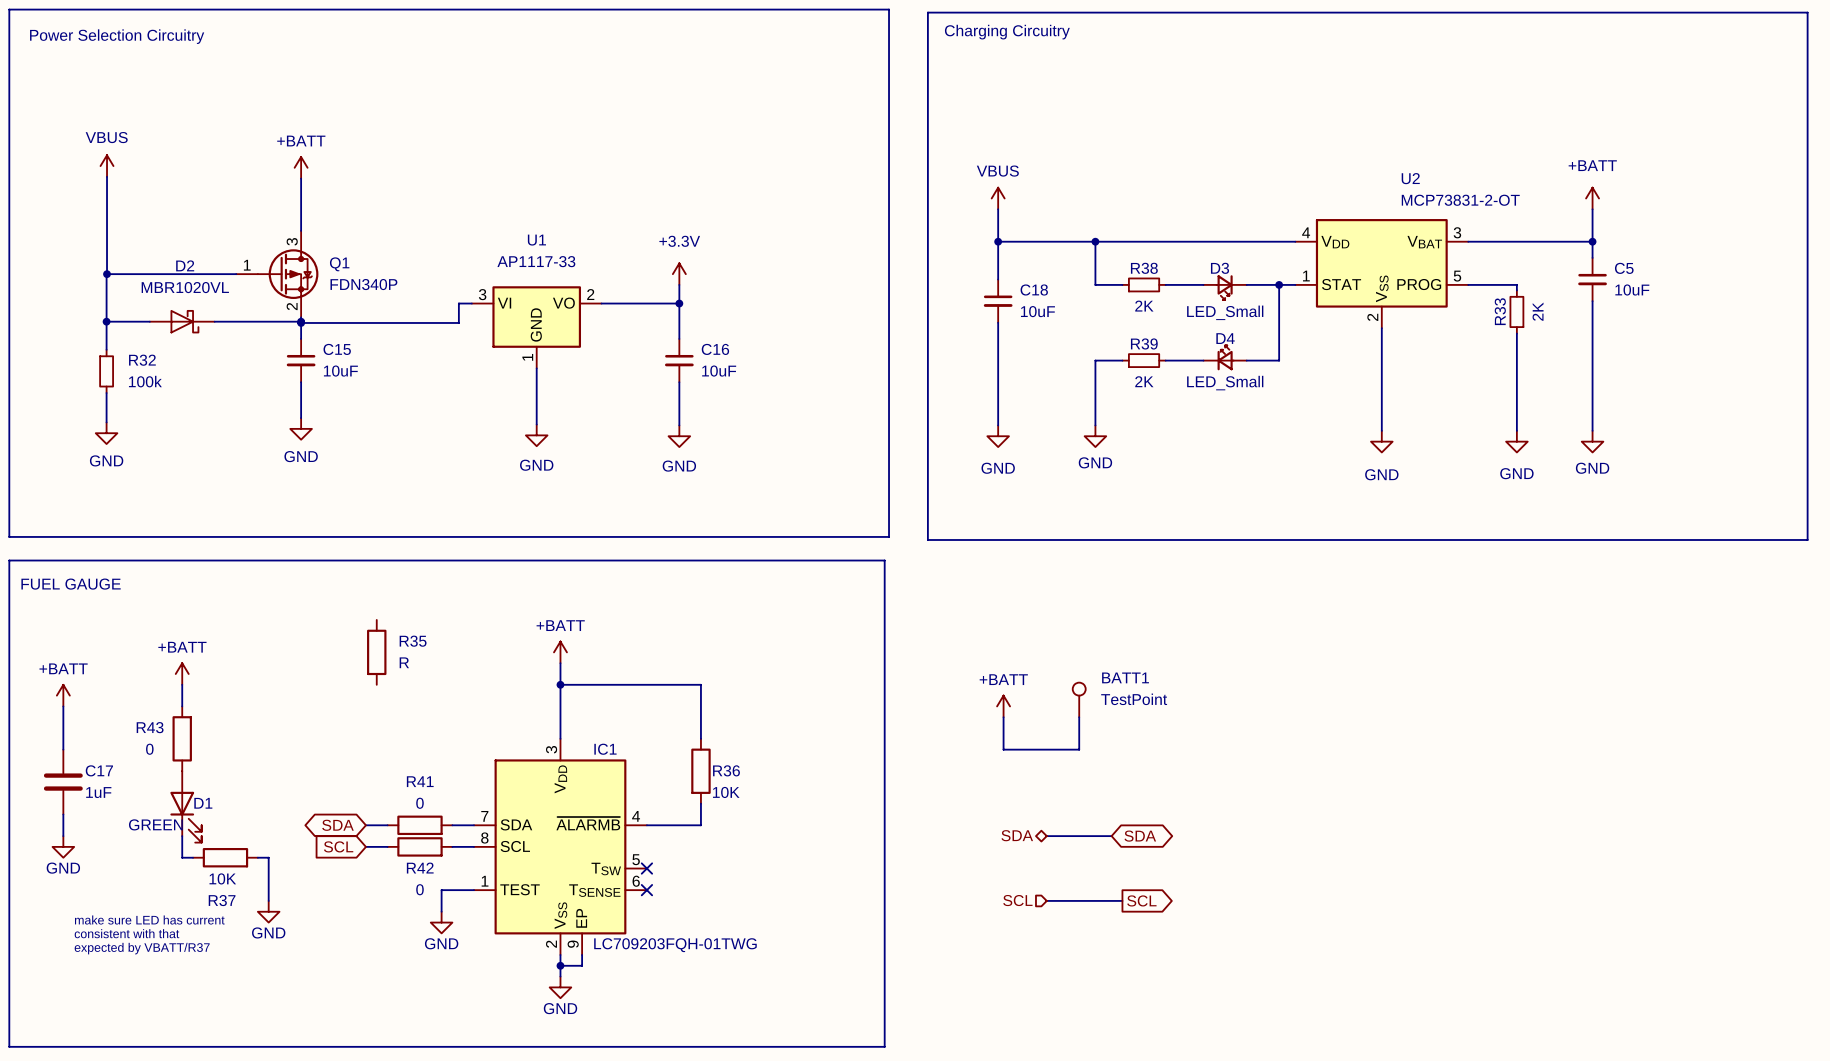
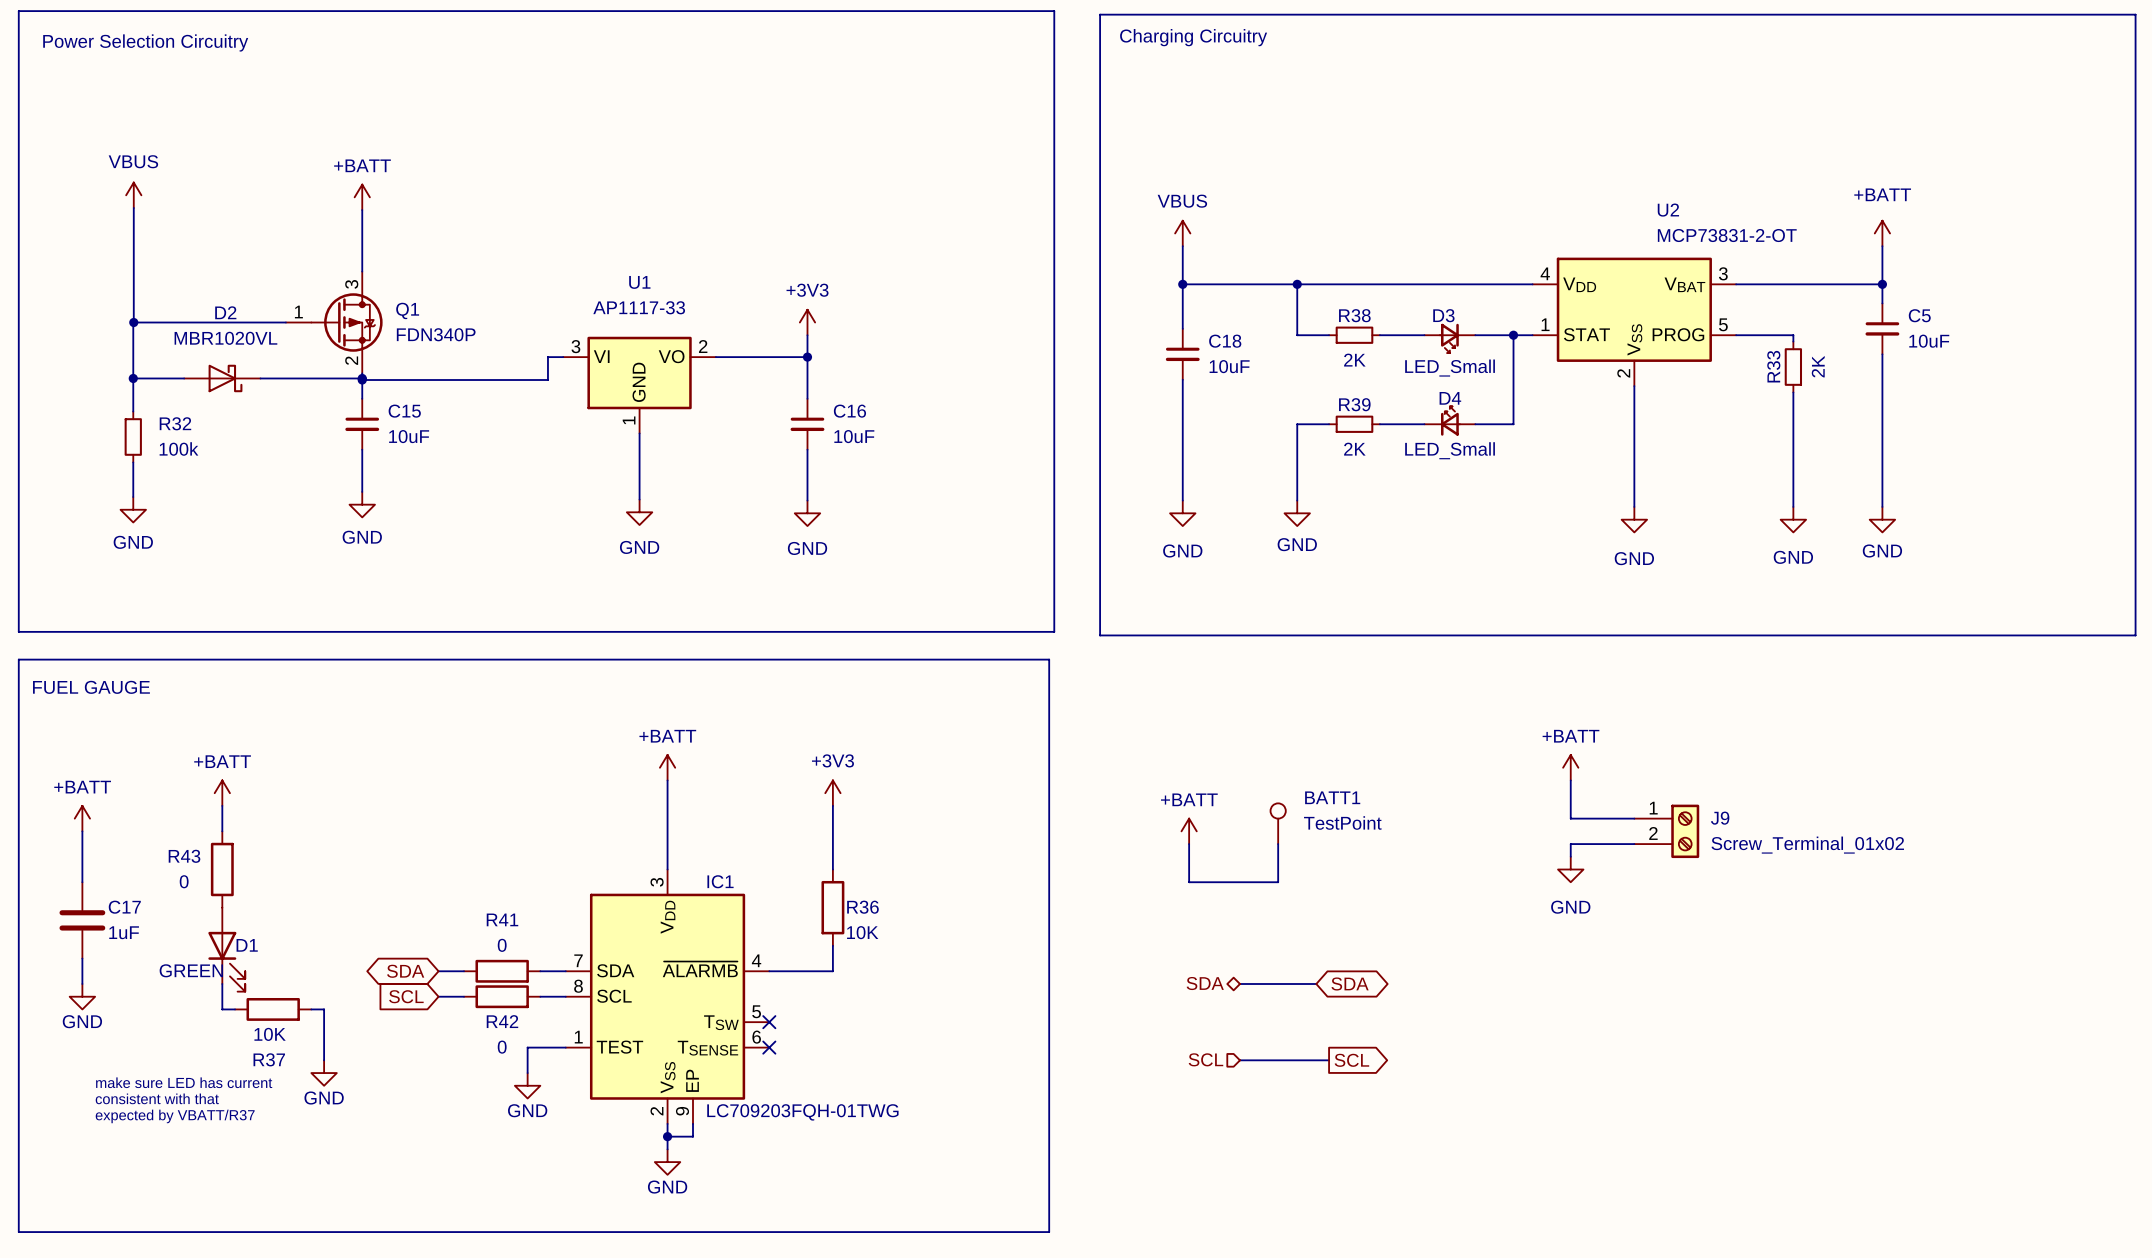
power symbol: +3.3V (679, 274) -> +3V3 (807, 322)
R35: R (376, 652) -> none
power symbol: none -> +BATT (1570, 767)
wire: none -> (1570, 780) (1570, 818) (1634, 818)
power symbol: none -> +3V3 (832, 793)
wire: (560, 684) (700, 684) -> none
junction: (560, 684) -> none
J9: none -> Screw_Terminal_01x02 (1666, 831)
wire: none -> (1634, 844) (1570, 844) (1570, 856)
power symbol: none -> GND (1570, 869)

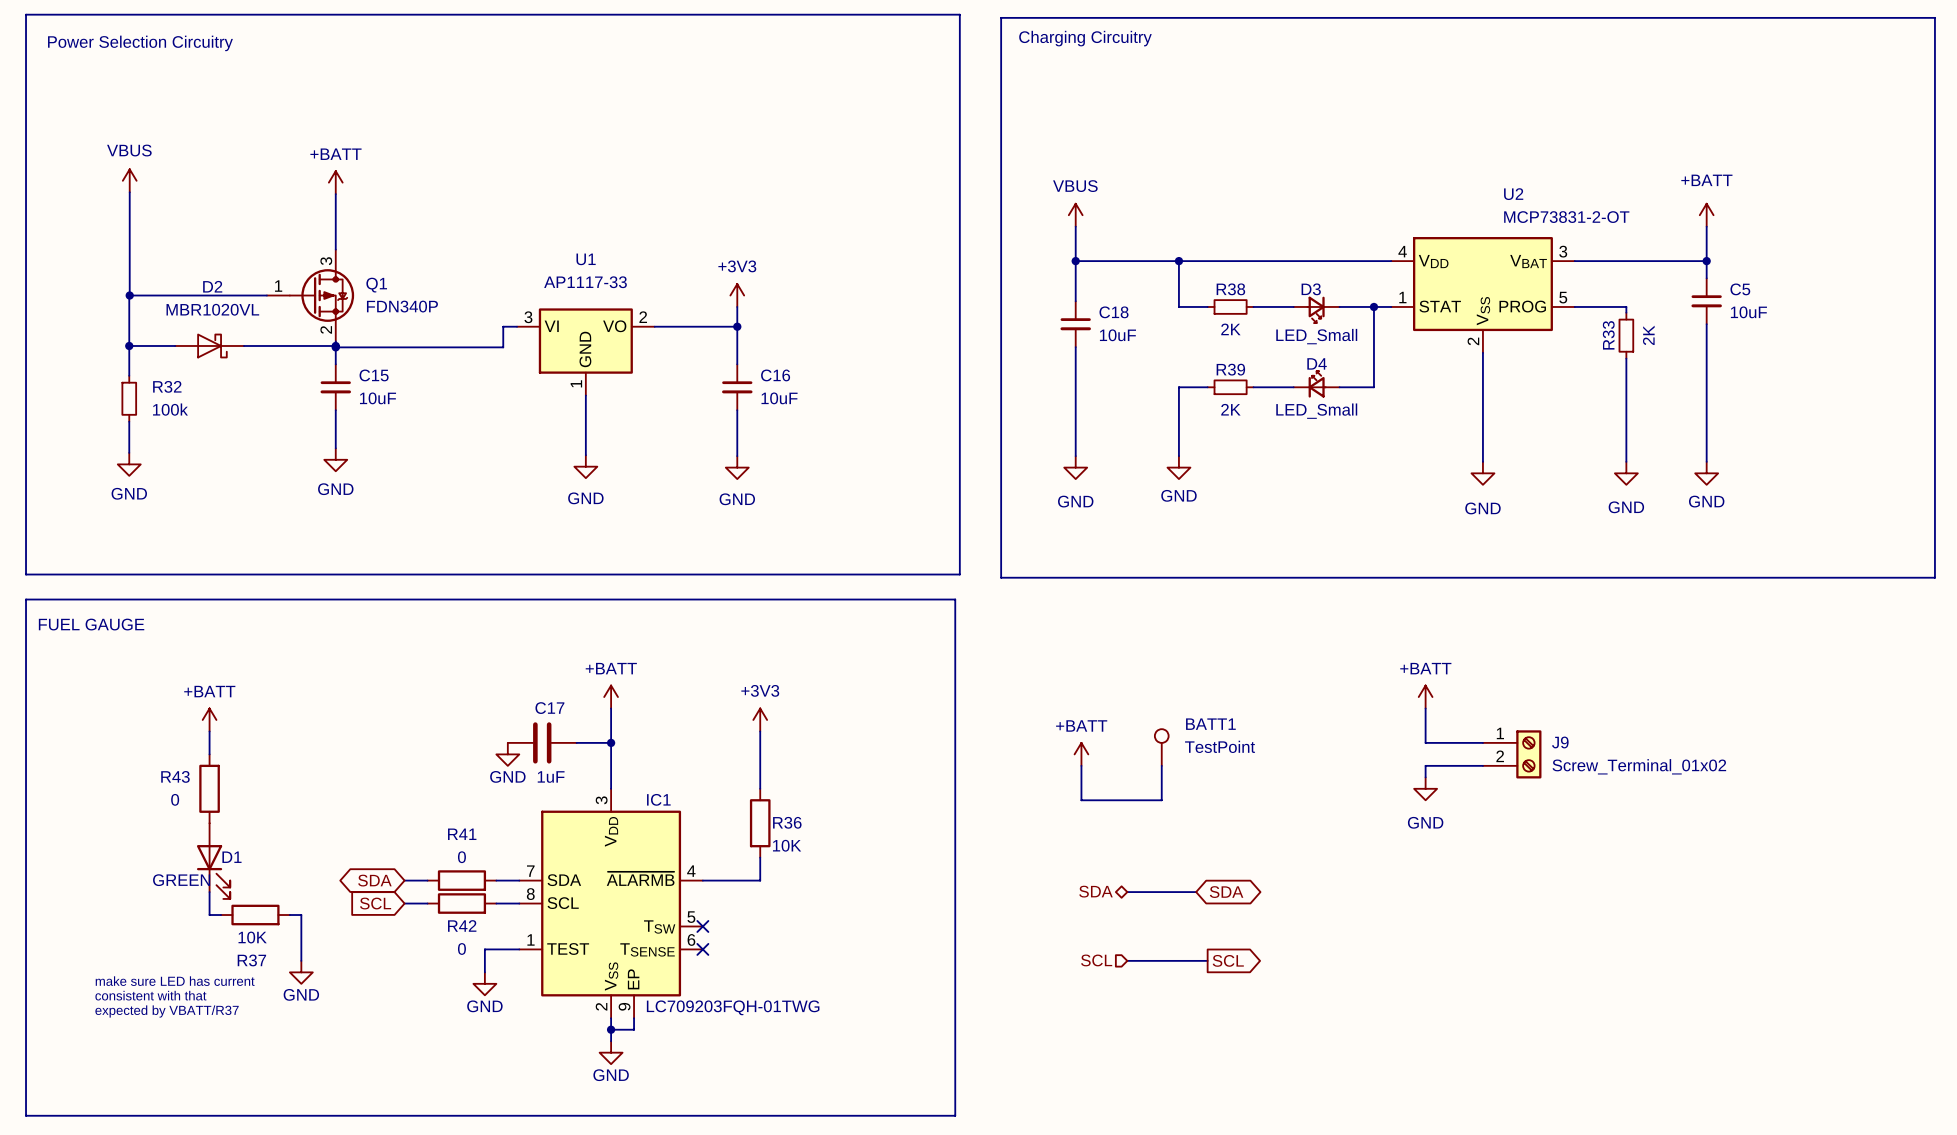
power symbol: +BATT (82, 818) -> none
wire: none -> (576, 742) (611, 742)
junction: none -> (611, 742)
wire: (82, 831) (82, 882) -> none
power symbol: none -> GND (507, 754)
C17 name position: C17 (124, 907) -> C17 (549, 708)
C17 rotation: 0° (82, 920) -> 90° clockwise (542, 742)
C17 position: (82, 920) -> (542, 742)
wire: (82, 958) (82, 984) -> none
power symbol: GND (82, 996) -> none

